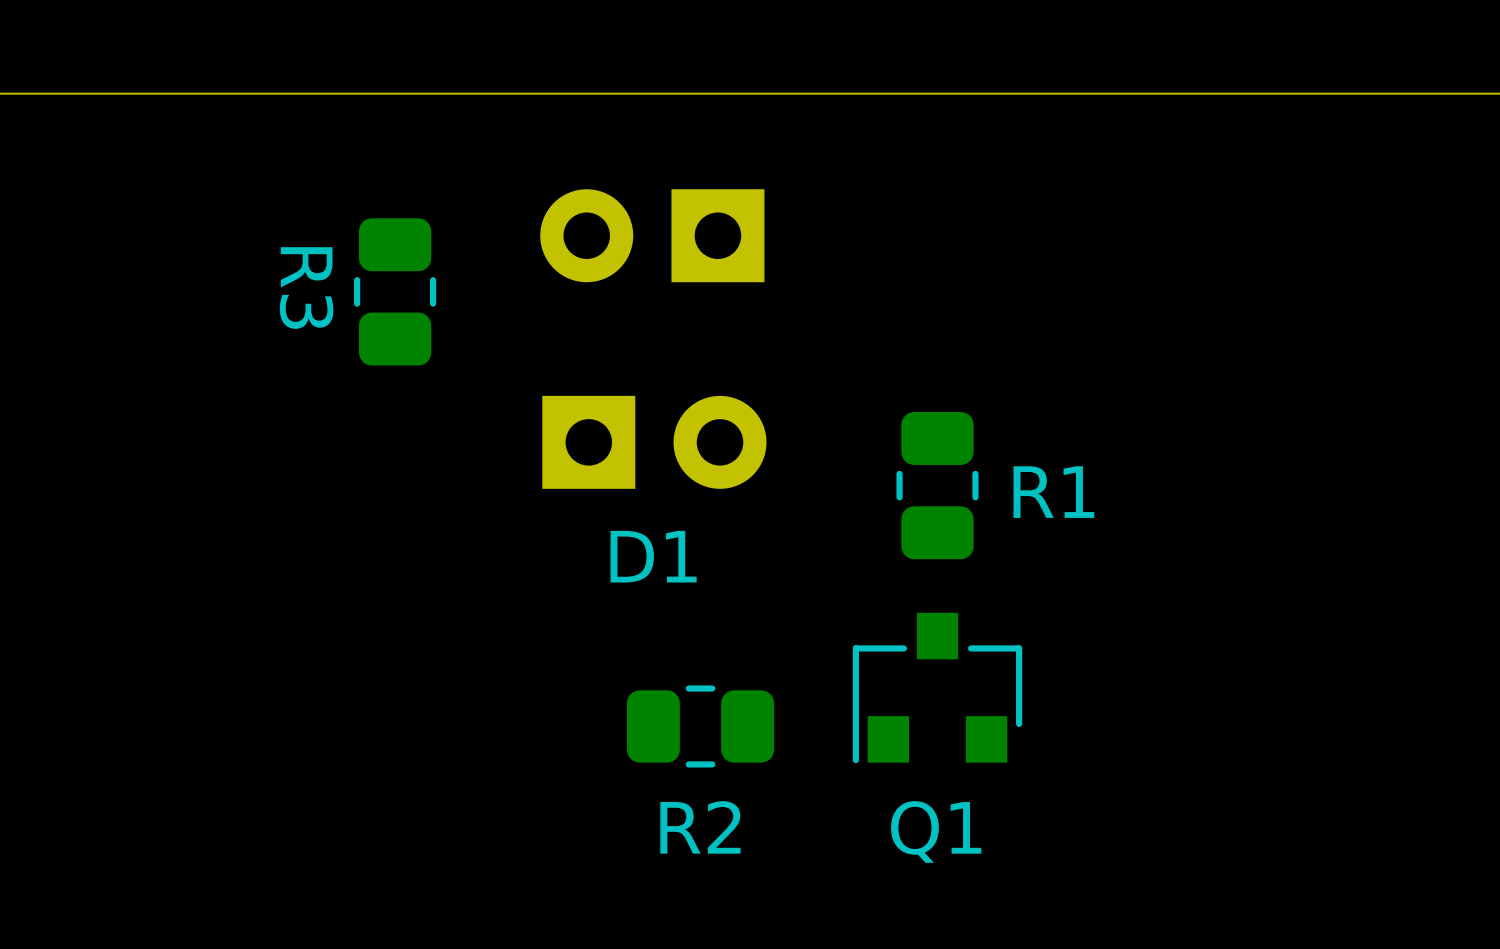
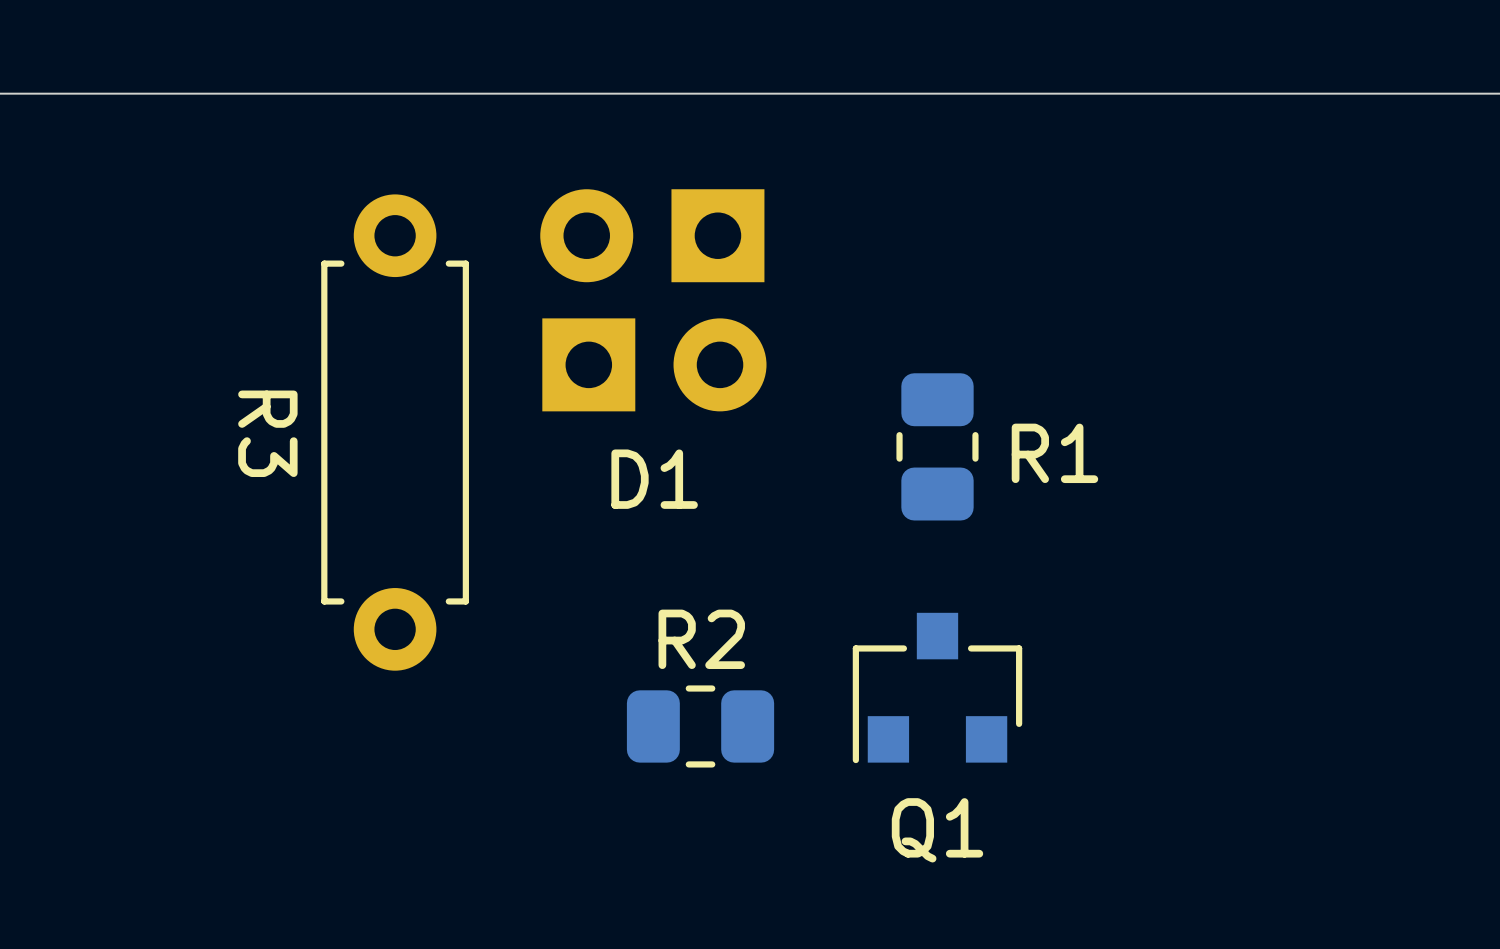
R3 footprint: [354, 218, 437, 366] -> [321, 194, 469, 671]
D1 position: (654, 442) -> (654, 364)
R1 position: (937, 485) -> (937, 446)
R2 name position: R2 (700, 827) -> R2 (701, 639)

